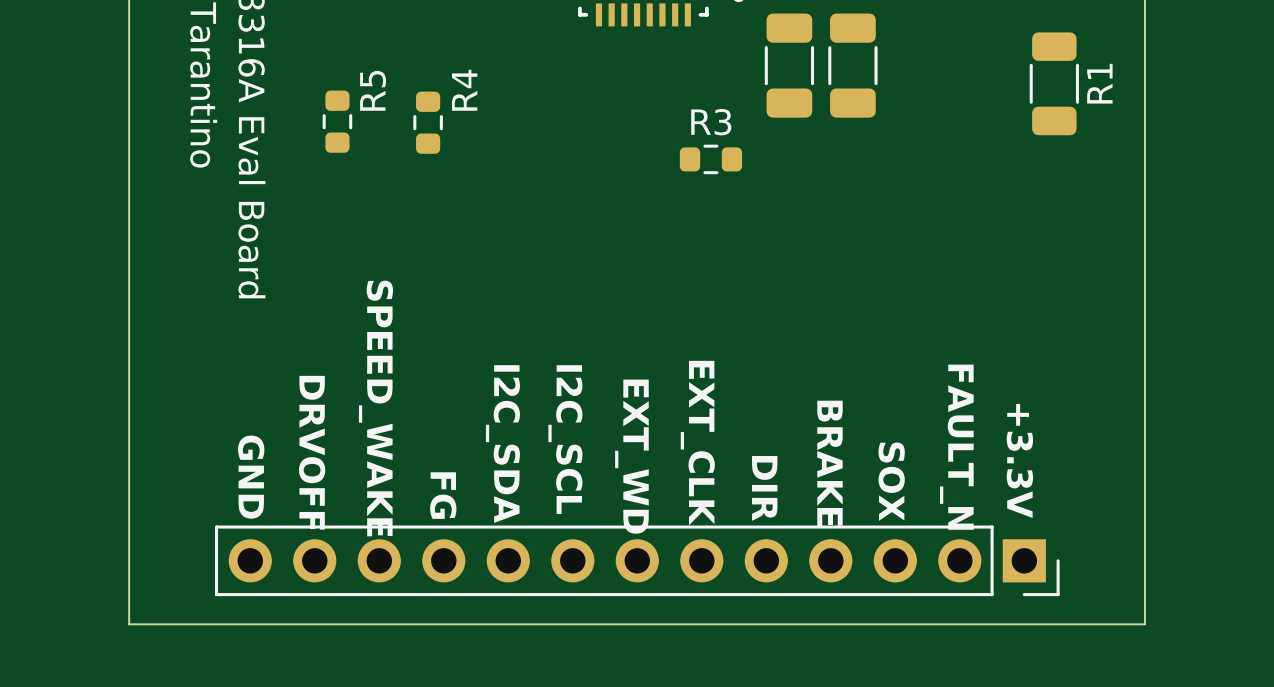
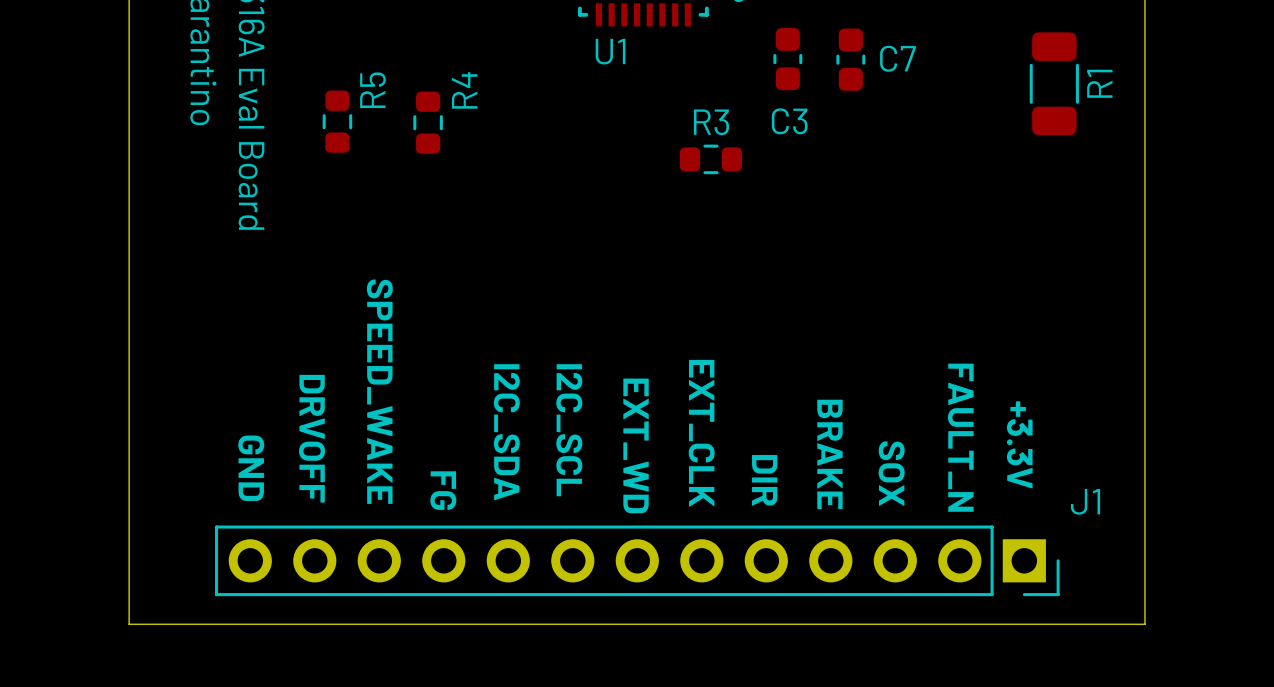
U1 name: none -> U1 (610, 51)
C3: none -> (787, 59)
C7: none -> (850, 59)
part: (789, 65) -> none
part: (852, 65) -> none
J1 name: none -> J1 (1085, 501)

